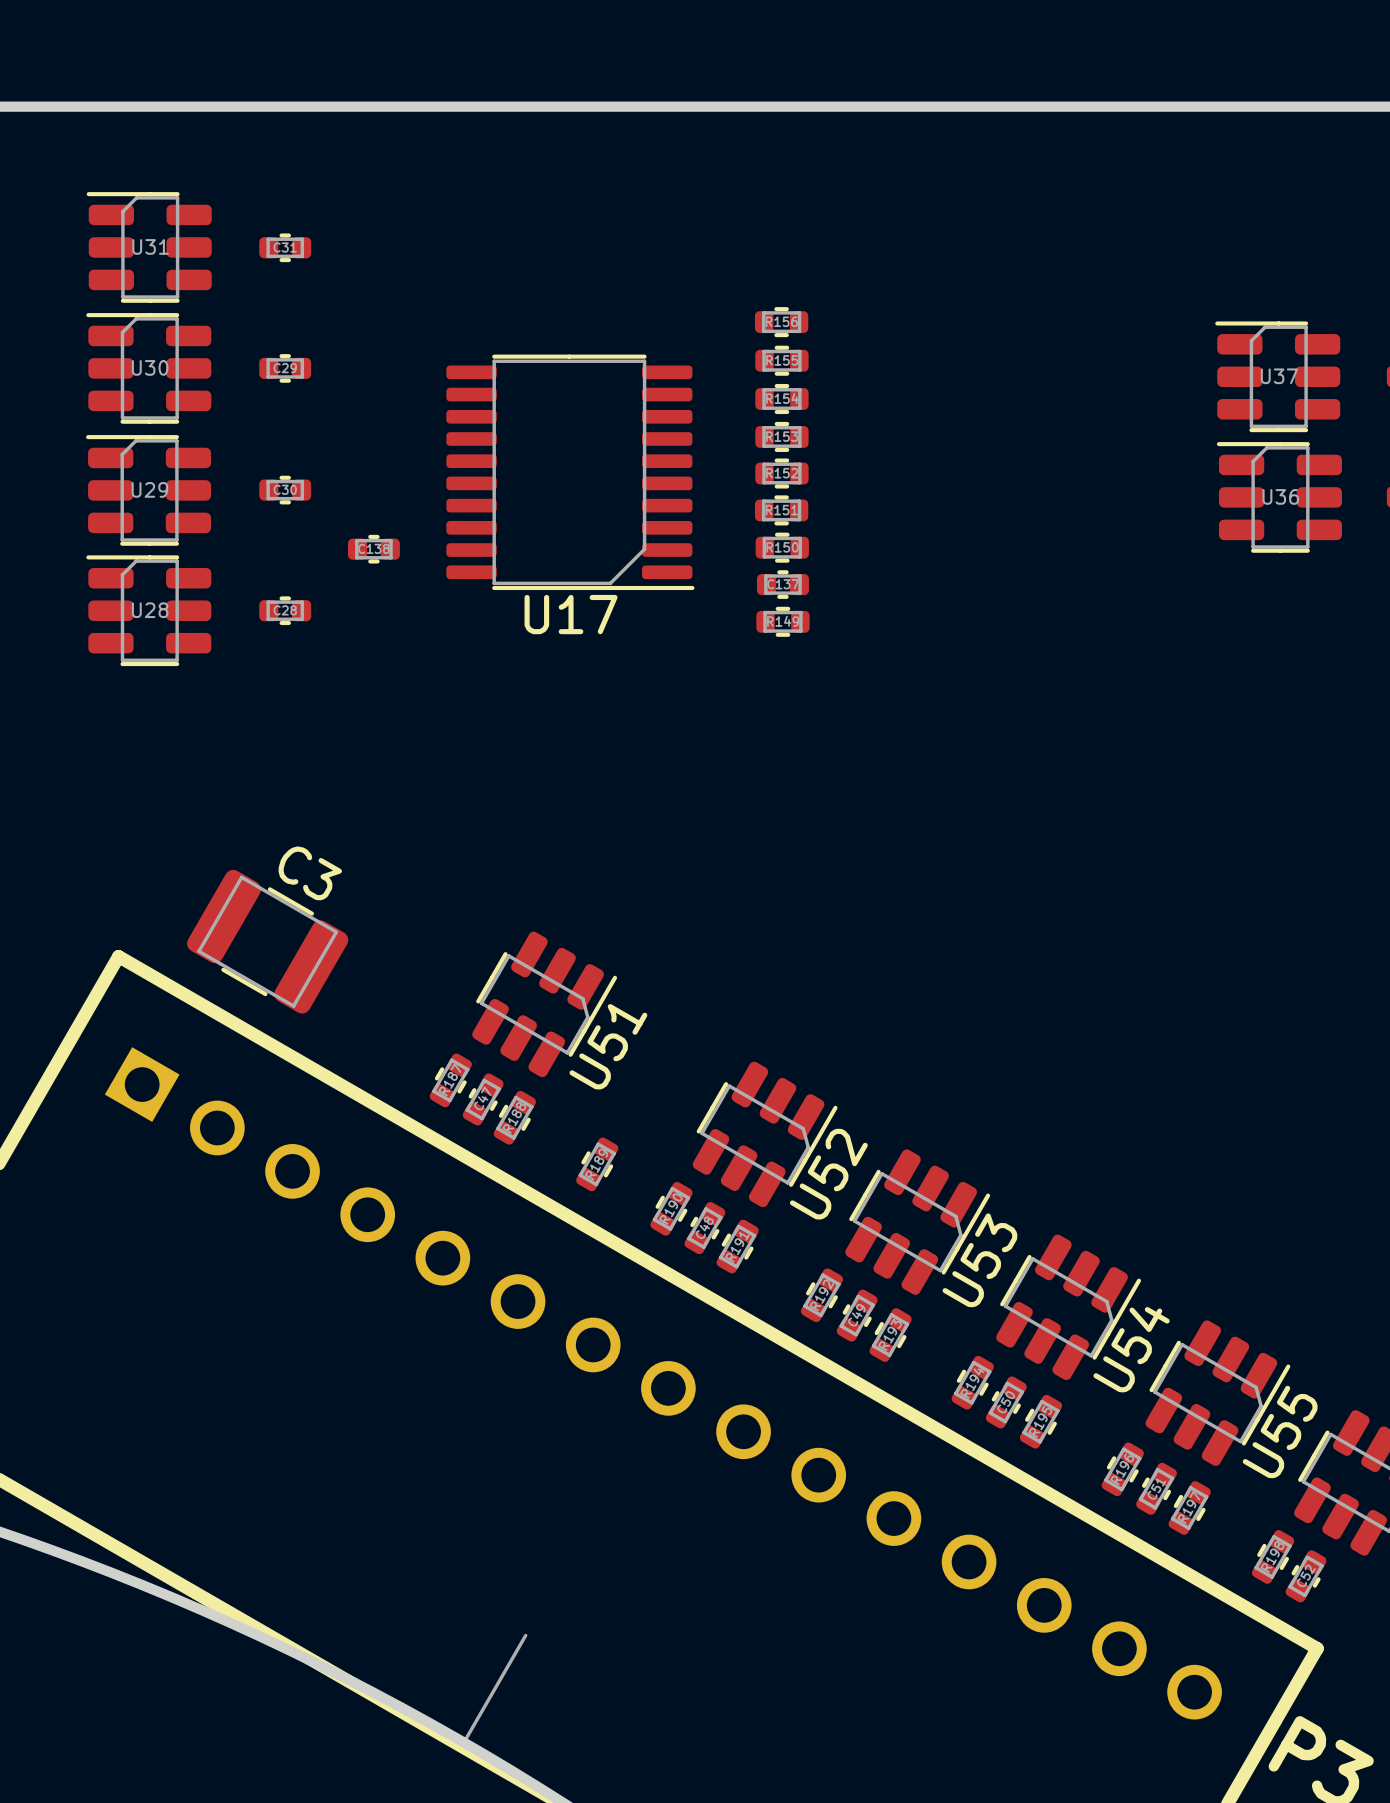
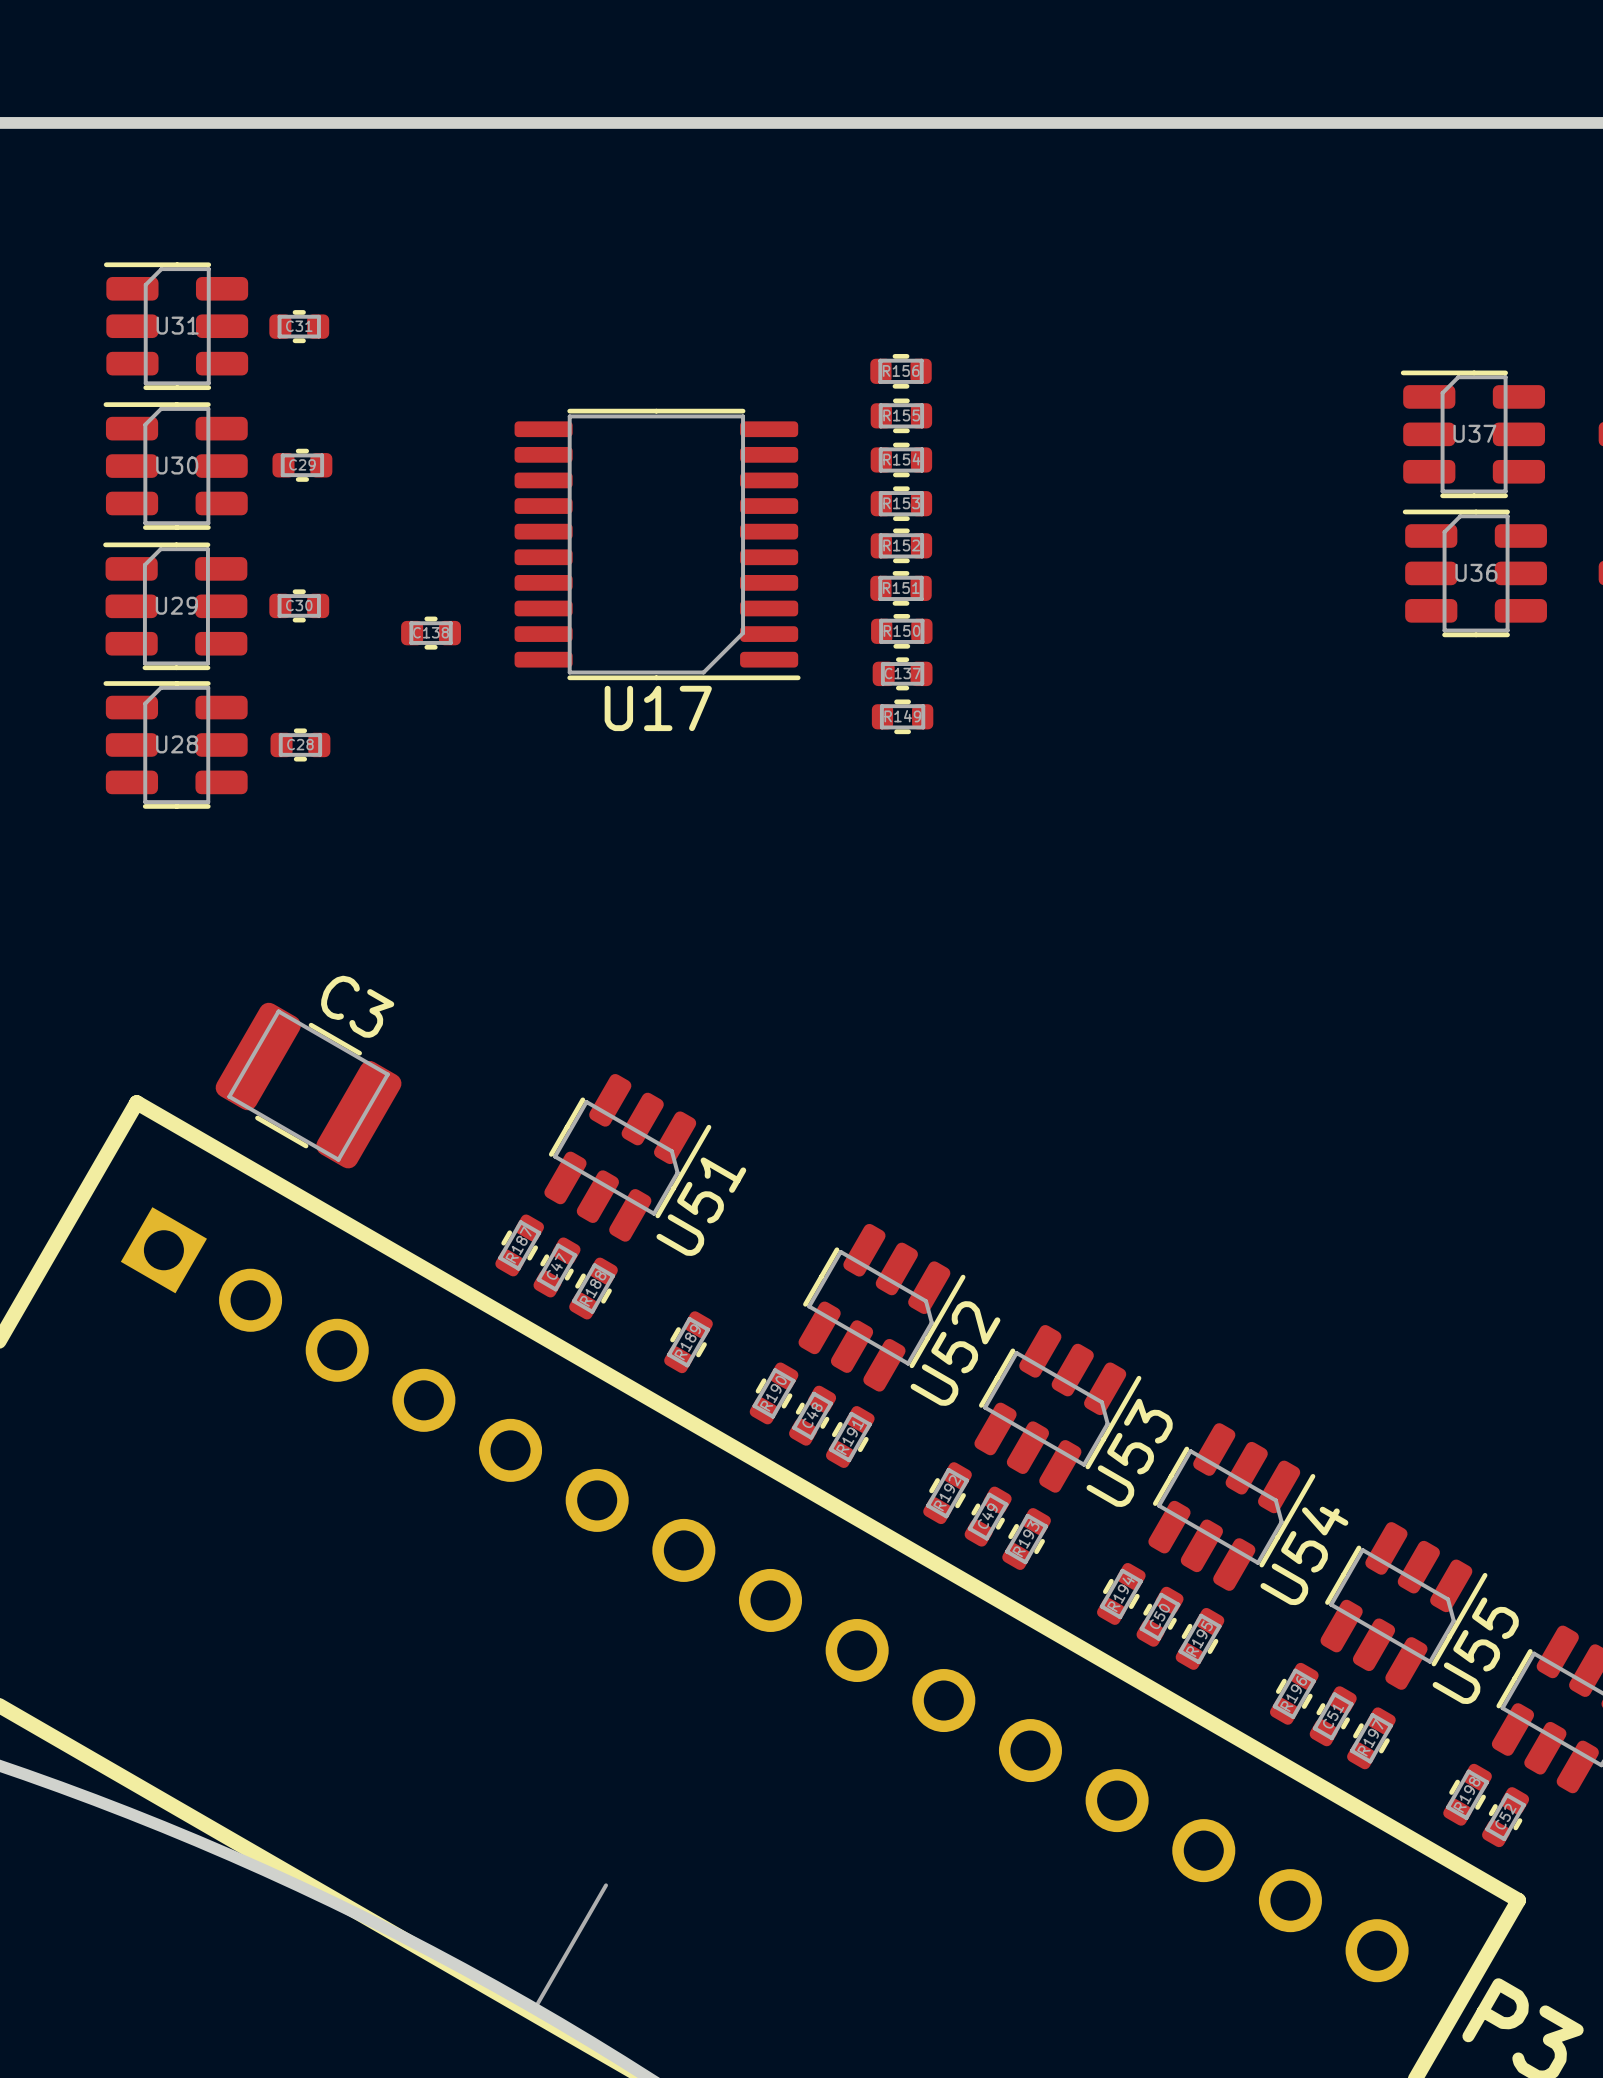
U31 position: (149, 247) -> (176, 326)
C31 position: (285, 247) -> (299, 326)
U30 position: (148, 368) -> (175, 466)
C29 position: (285, 368) -> (302, 465)
U29 position: (148, 490) -> (175, 606)
C30 position: (285, 490) -> (299, 605)
U28 position: (148, 610) -> (175, 744)
C28 position: (285, 610) -> (300, 744)

